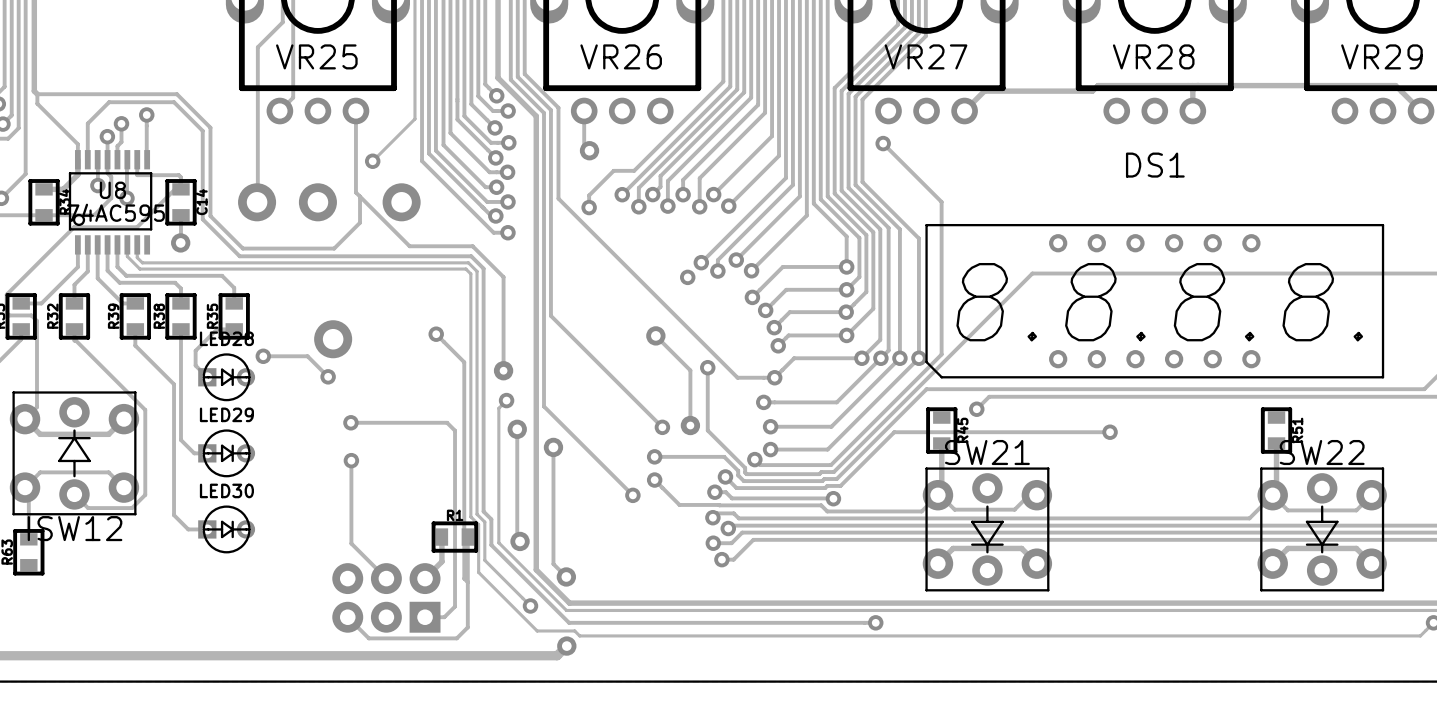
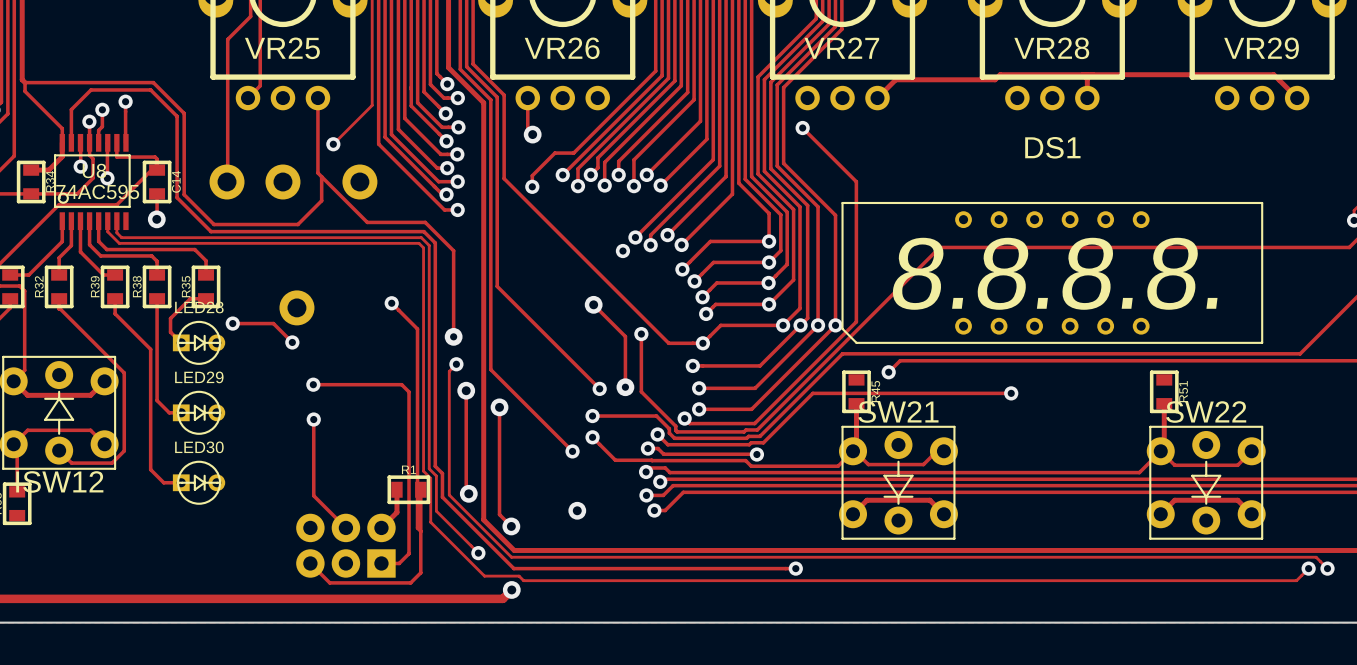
via: none -> (577, 510)

